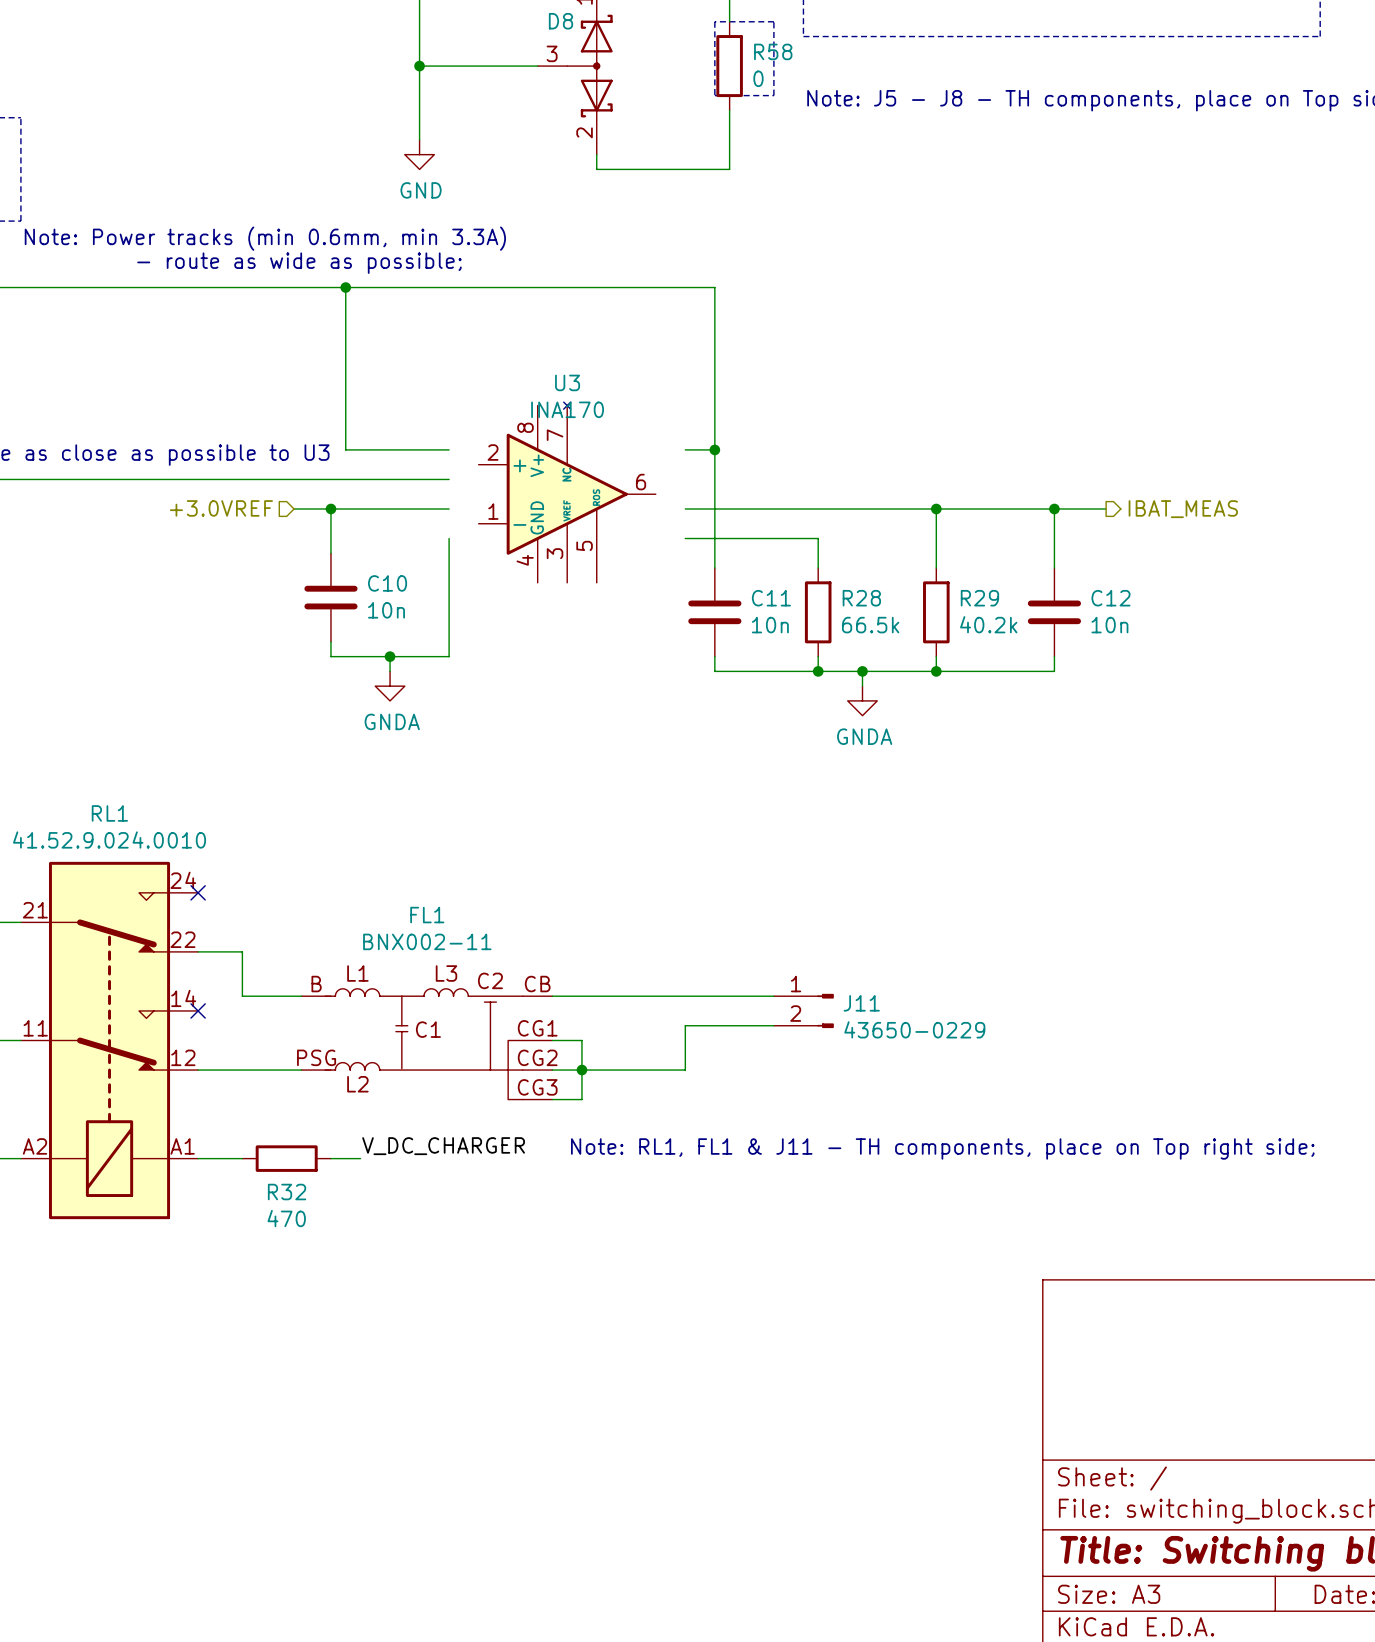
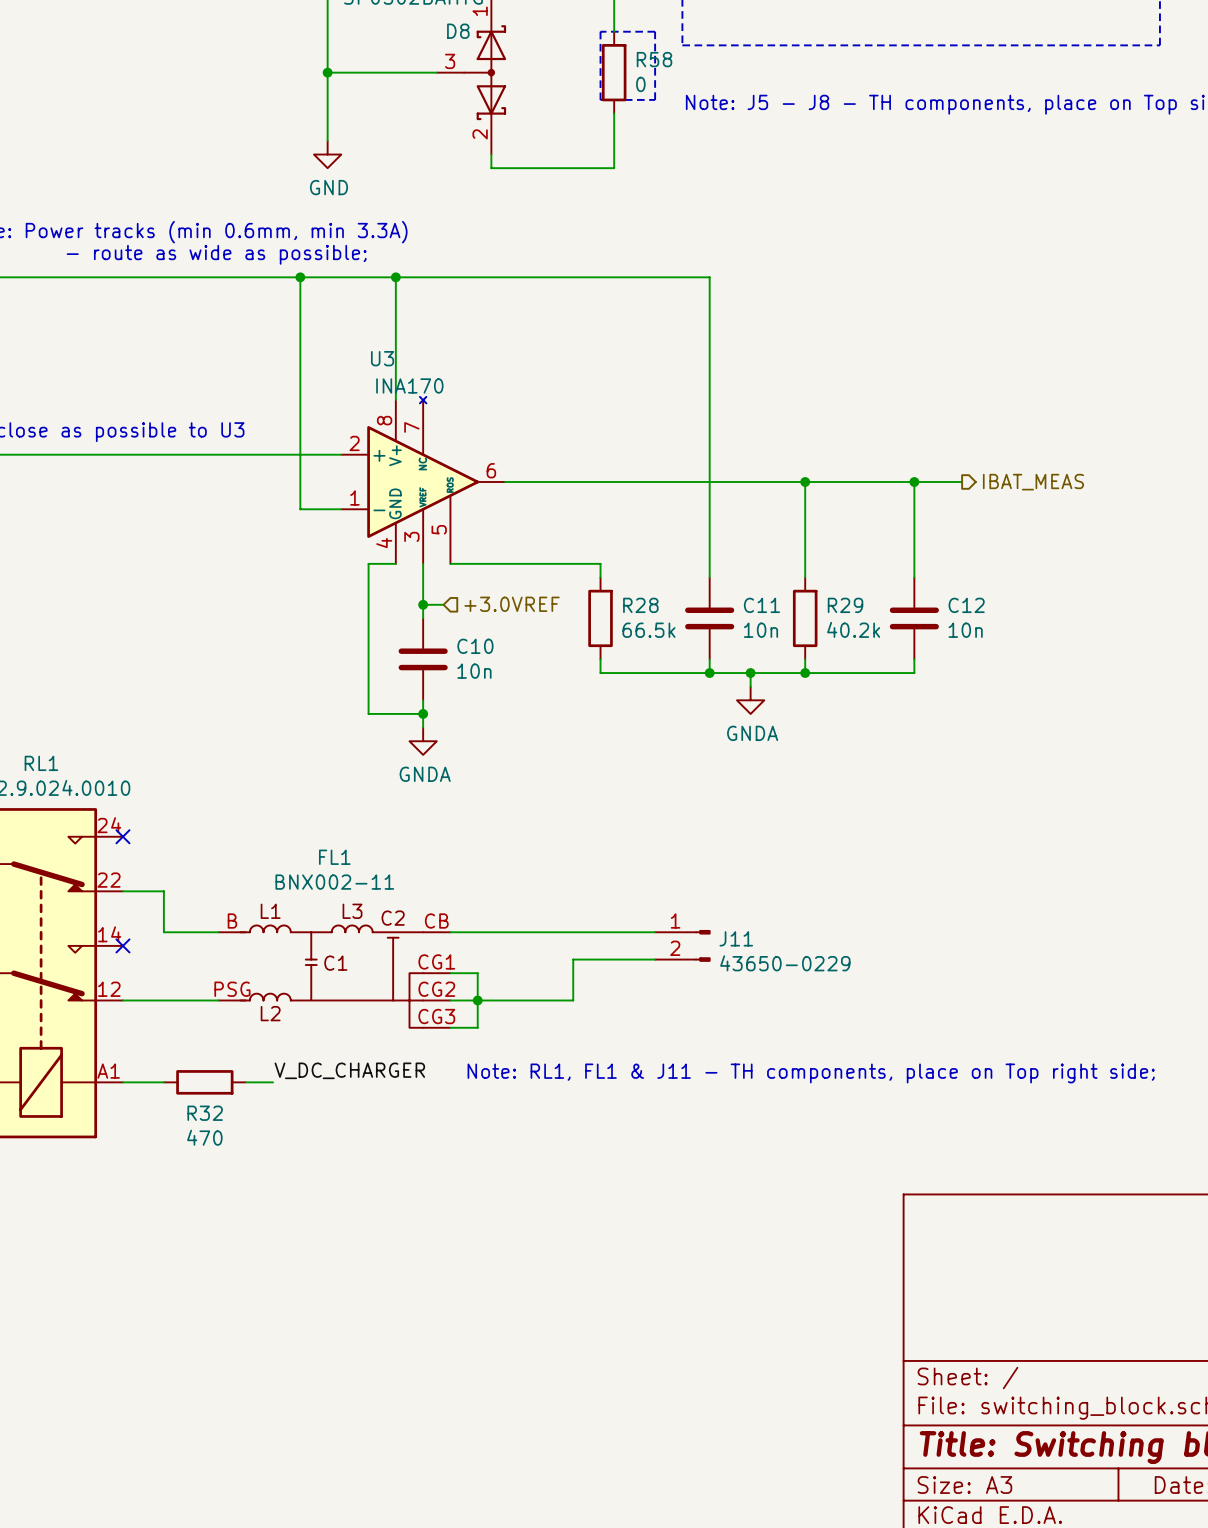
wire: (345, 287) (345, 449) (449, 449) -> none
junction position: (345, 287) -> (300, 277)
wire: none -> (300, 277) (300, 509) (341, 509)
wire: none -> (395, 277) (395, 400)
junction: none -> (395, 277)
wire: (714, 287) (714, 568) -> (600, 277) (709, 277) (709, 577)
U3 name position: U3 (567, 382) -> U3 (382, 358)
U3 value position: INA170 (567, 409) -> INA170 (409, 385)
wire: (685, 449) (714, 449) -> none
junction: (714, 449) -> none
U3 position: (567, 492) -> (423, 480)
hierarchical label: +3.0VREF (221, 508) -> none
wire: (294, 508) (449, 508) -> none
wire: (330, 508) (330, 553) -> none
junction: (330, 508) -> none
wire: none -> (505, 481) (573, 481)
wire: (449, 538) (449, 656) (330, 656) (330, 641) -> none
wire: (685, 538) (818, 538) (818, 568) -> none
wire: none -> (805, 536) (805, 577)
C10 position: (330, 597) -> (423, 659)
wire: none -> (395, 563) (368, 563) (368, 713) (423, 713)
wire: none -> (423, 563) (423, 618)
wire: none -> (450, 563) (600, 563) (600, 577)
C11 position: (714, 612) -> (709, 618)
R28 position: (818, 612) -> (600, 618)
R29 position: (936, 612) -> (805, 618)
C12 position: (1054, 612) -> (914, 618)
wire: none -> (423, 604) (443, 604)
junction: none -> (423, 604)
hierarchical label: none -> +3.0VREF (512, 604)
wire: (390, 656) (390, 671) -> none
junction: (390, 656) -> none
wire: (714, 656) (714, 671) (1054, 671) (1054, 656) -> (600, 659) (600, 673) (914, 673) (914, 659)
wire: (818, 656) (818, 671) -> (709, 659) (709, 673)
wire: (936, 656) (936, 671) -> (805, 659) (805, 673)
junction: (818, 671) -> none
wire: (862, 671) (862, 686) -> (750, 673) (750, 686)
junction: (862, 671) -> none
junction: (936, 671) -> none
power symbol position: GNDA (390, 686) -> GNDA (423, 741)
power symbol position: GNDA (862, 700) -> GNDA (750, 700)
junction: none -> (709, 673)
junction: none -> (750, 673)
junction: none -> (805, 673)
wire: none -> (423, 700) (423, 727)
junction: none -> (423, 713)

